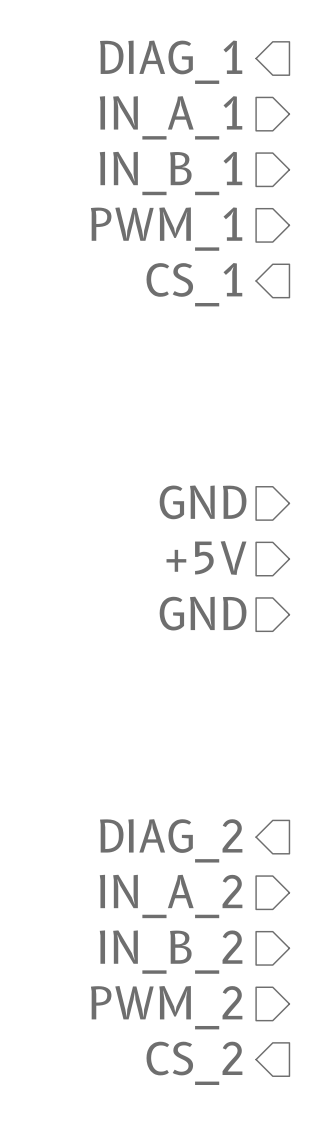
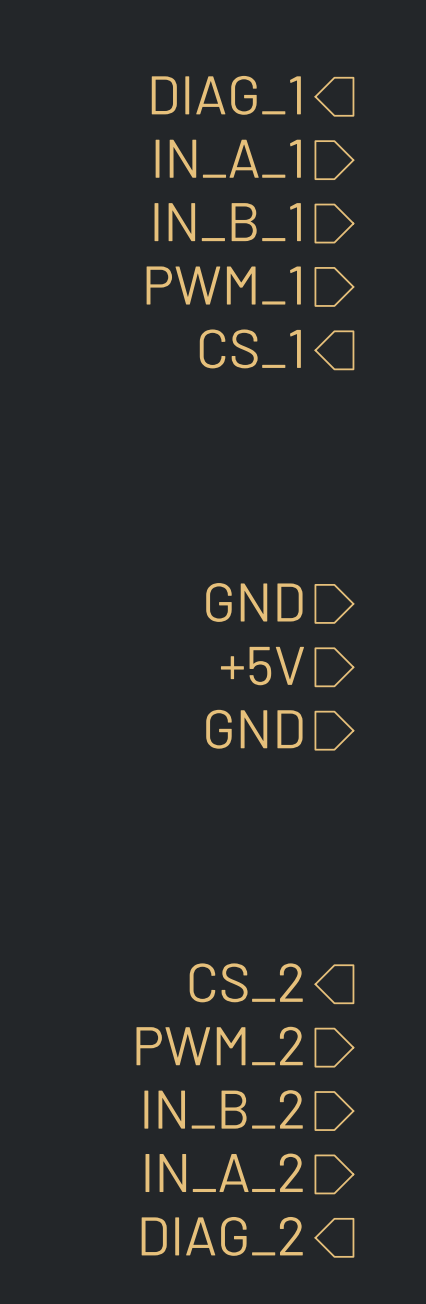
hierarchical label: DIAG_2 (171, 840) -> CS_2 (246, 982)
hierarchical label: IN_A_2 (171, 896) -> PWM_2 (219, 1046)
hierarchical label: PWM_2 (166, 1007) -> IN_A_2 (224, 1172)
hierarchical label: CS_2 (194, 1063) -> DIAG_2 (222, 1236)

